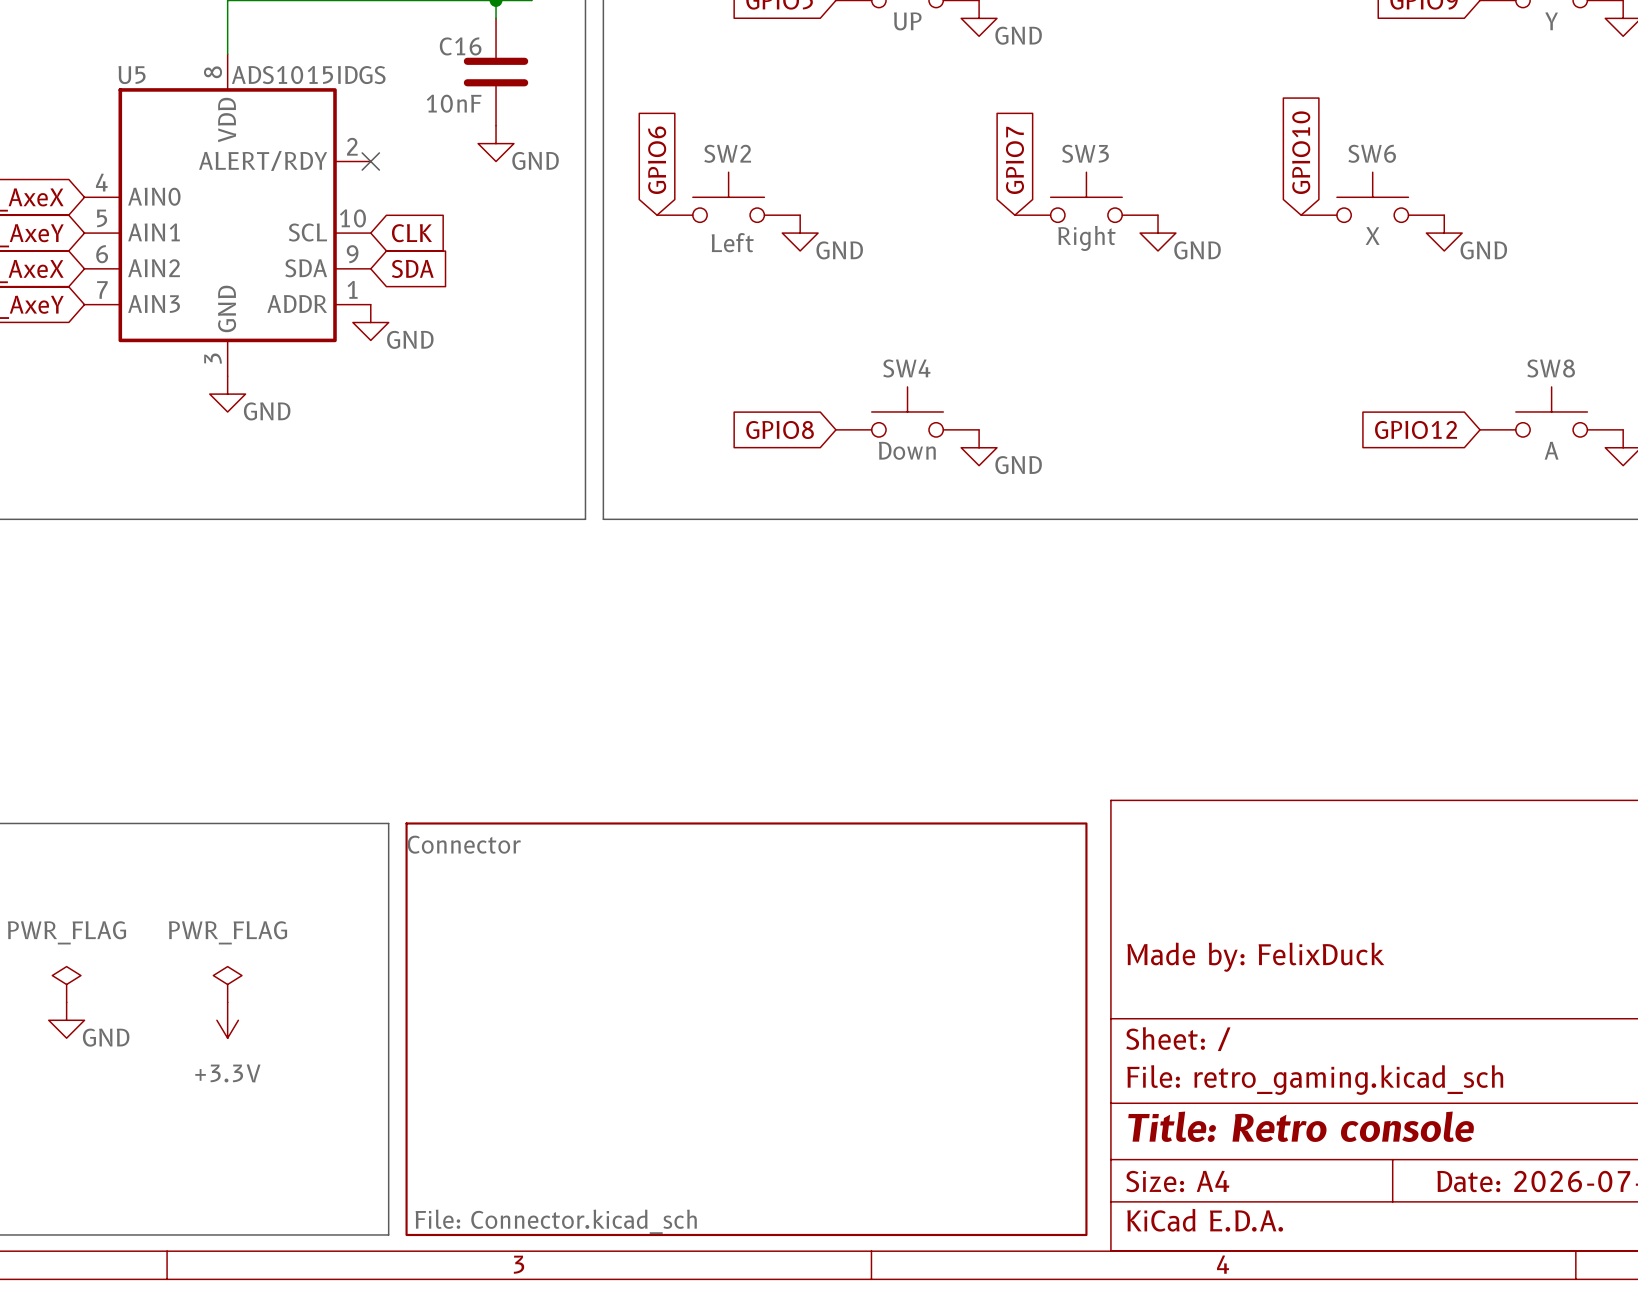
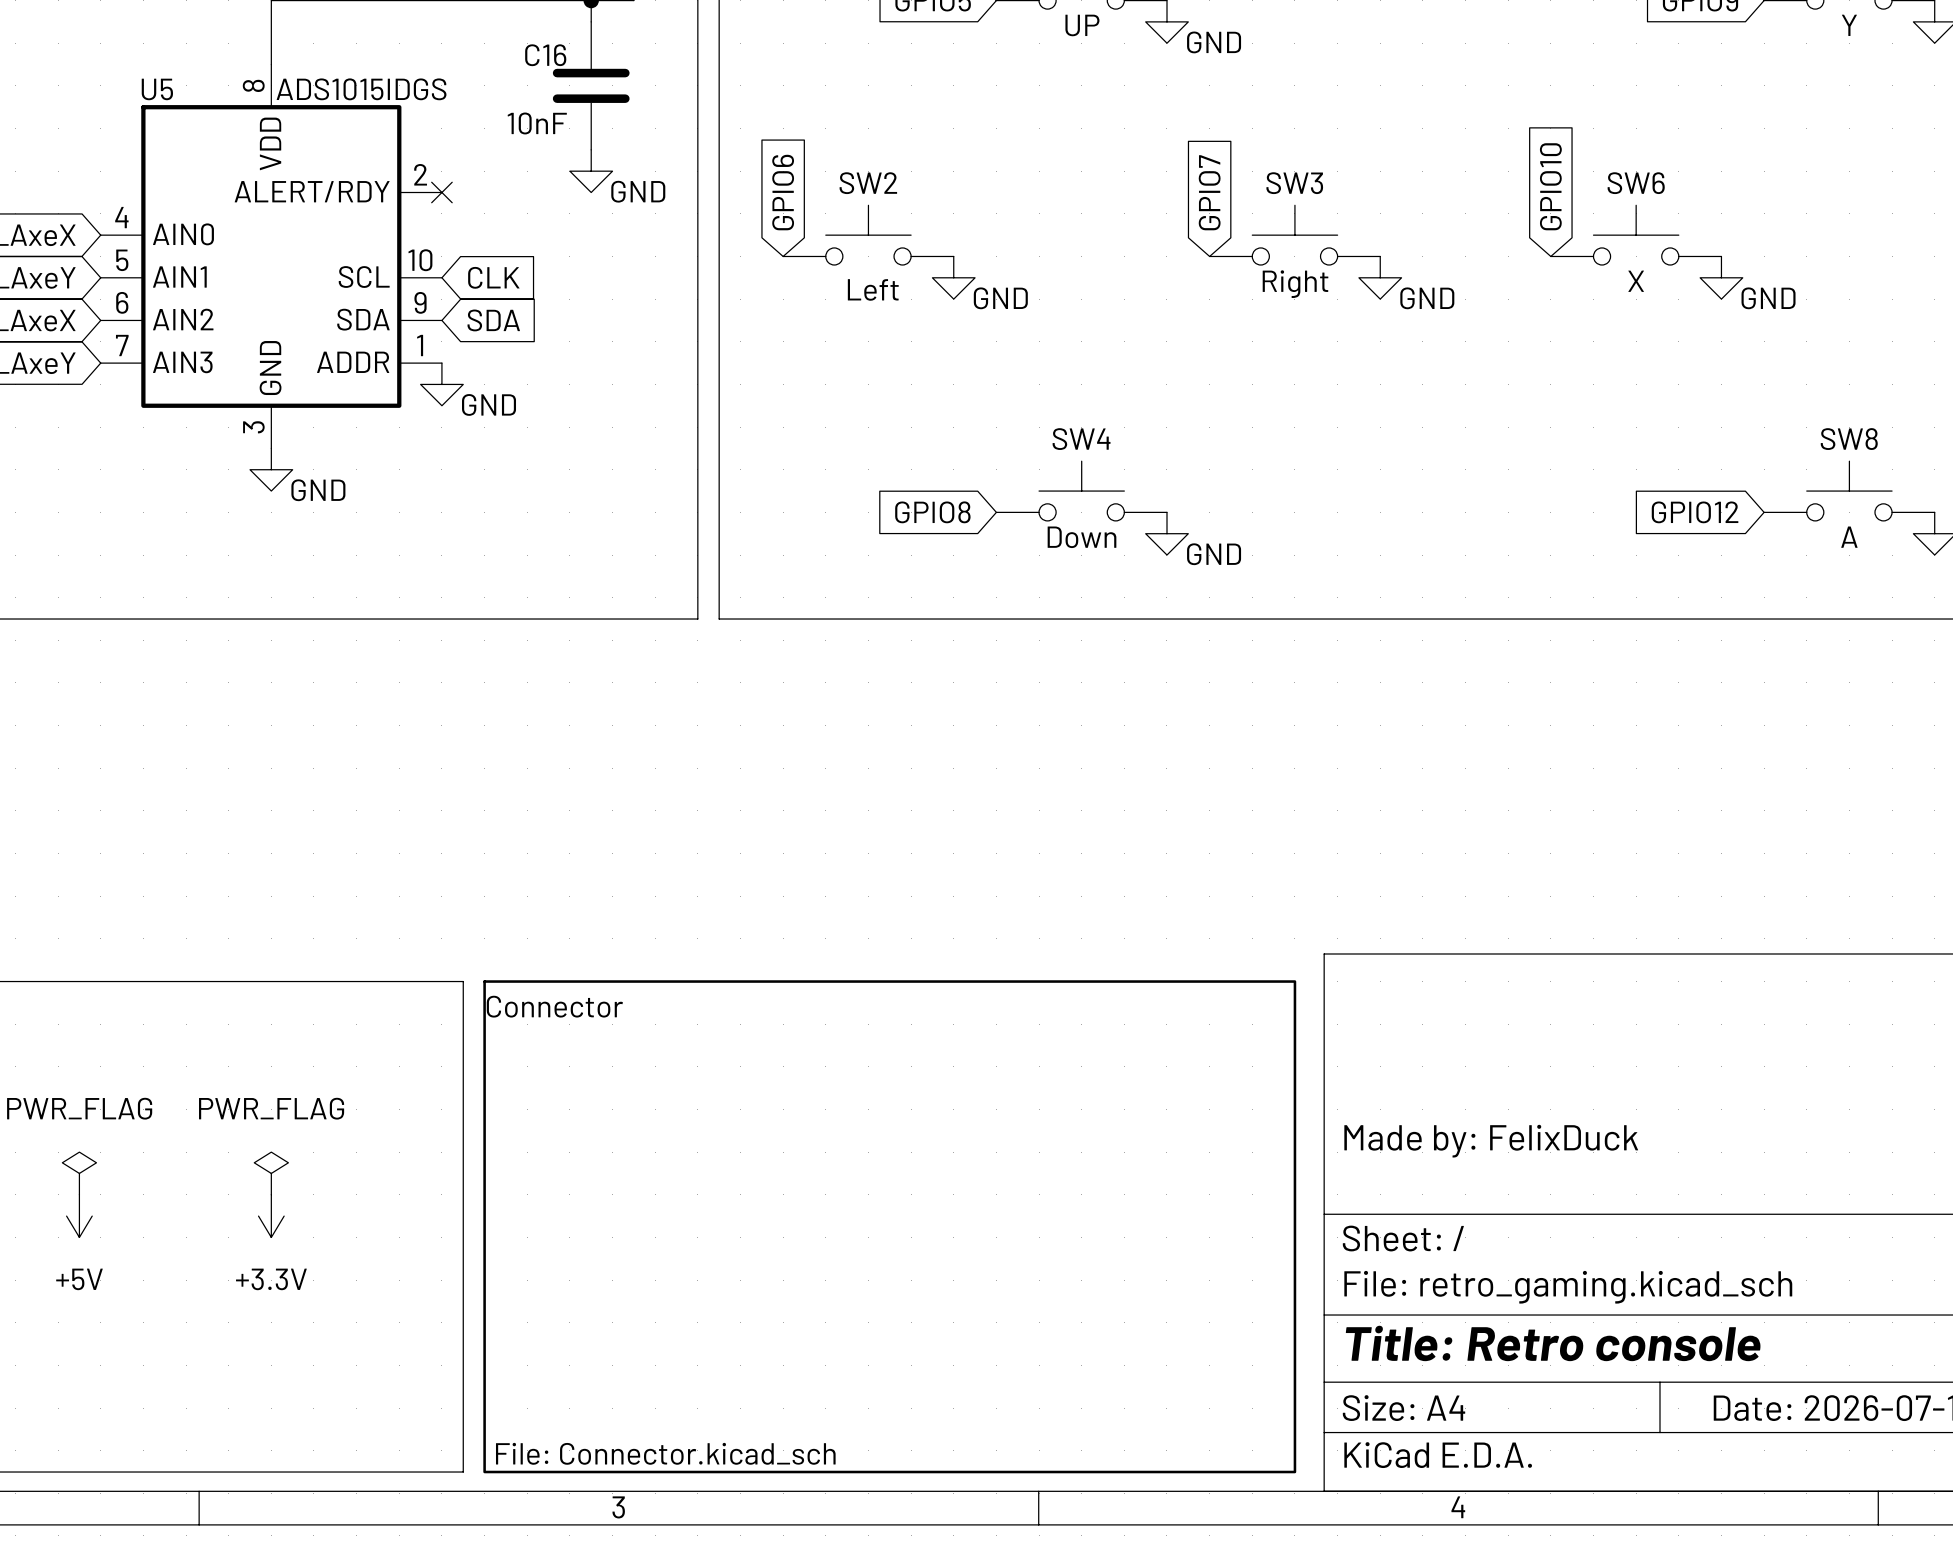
power symbol: GND (66, 1020) -> +5V (79, 1216)

